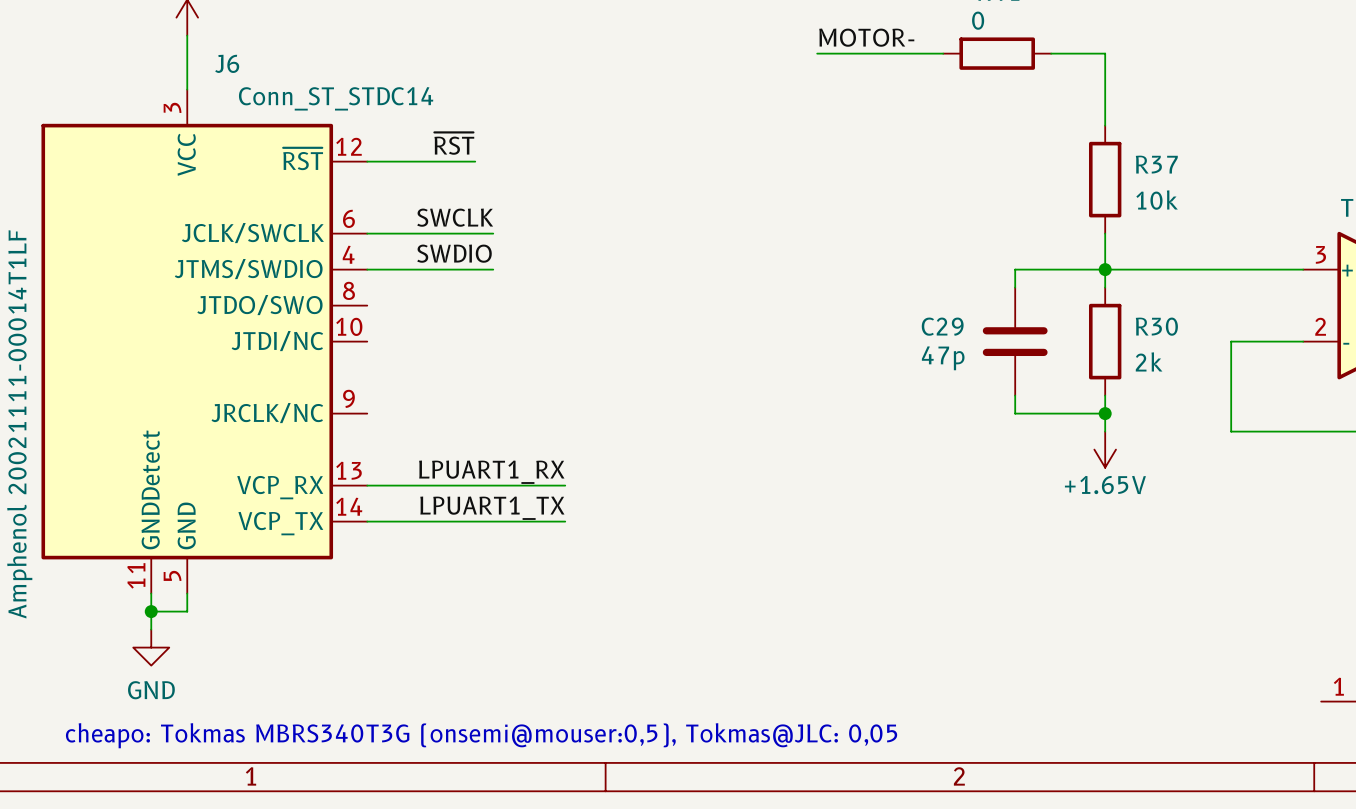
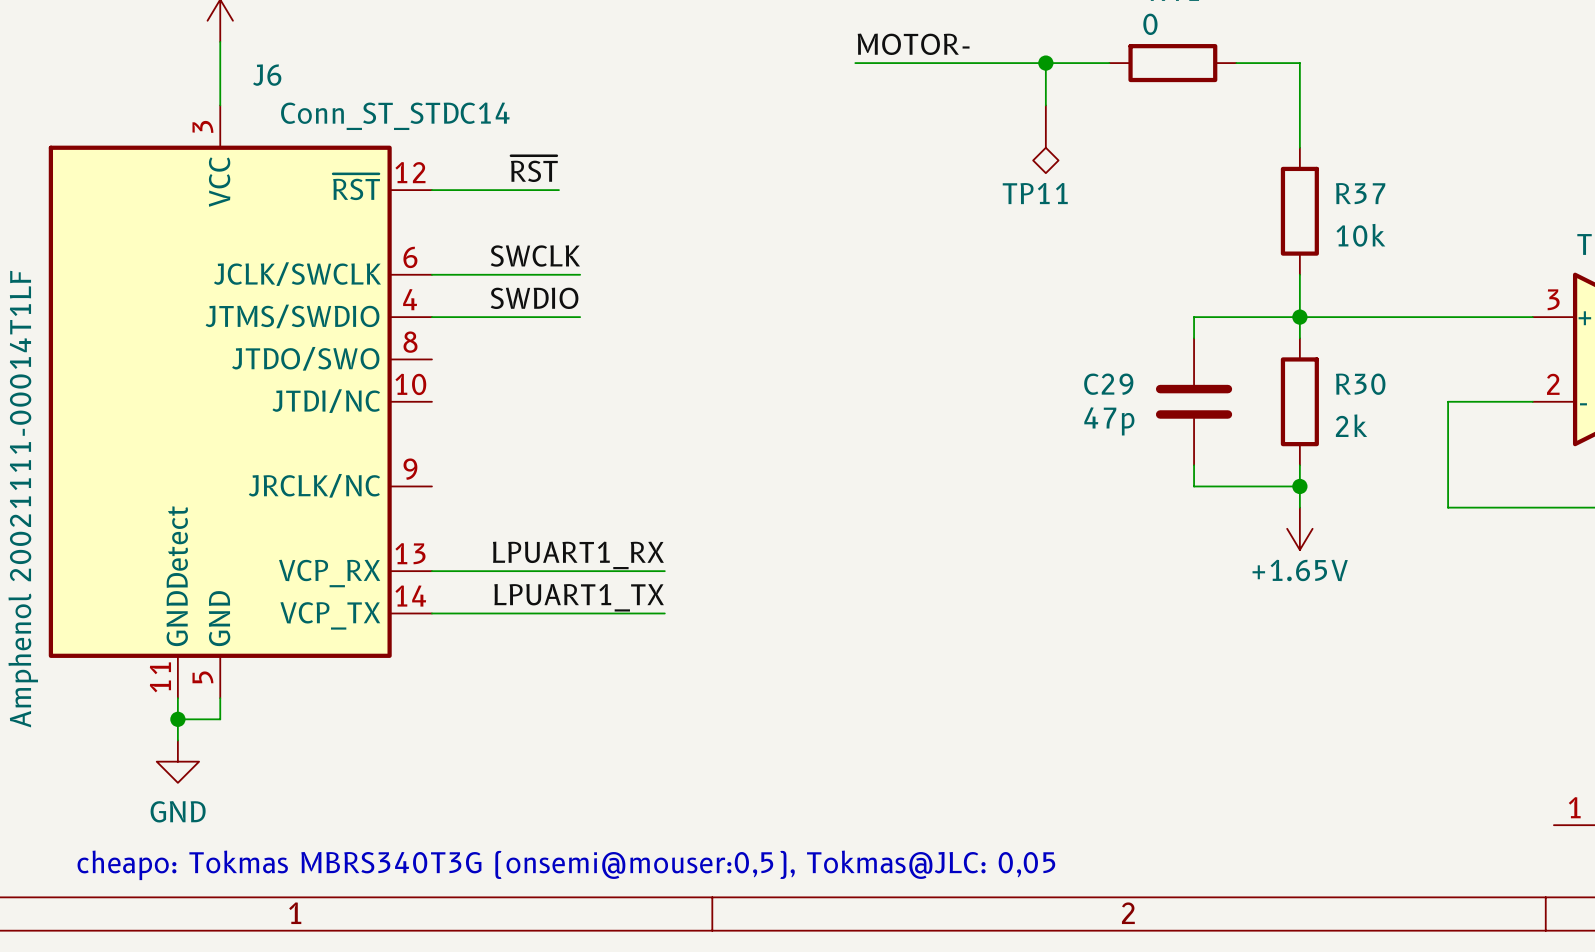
label position: MOTOR- (866, 37) -> MOTOR- (913, 44)
wire: none -> (855, 63) (961, 63)
wire: none -> (1045, 63) (1045, 105)
junction: none -> (1045, 63)
TP11: none -> (1045, 139)

